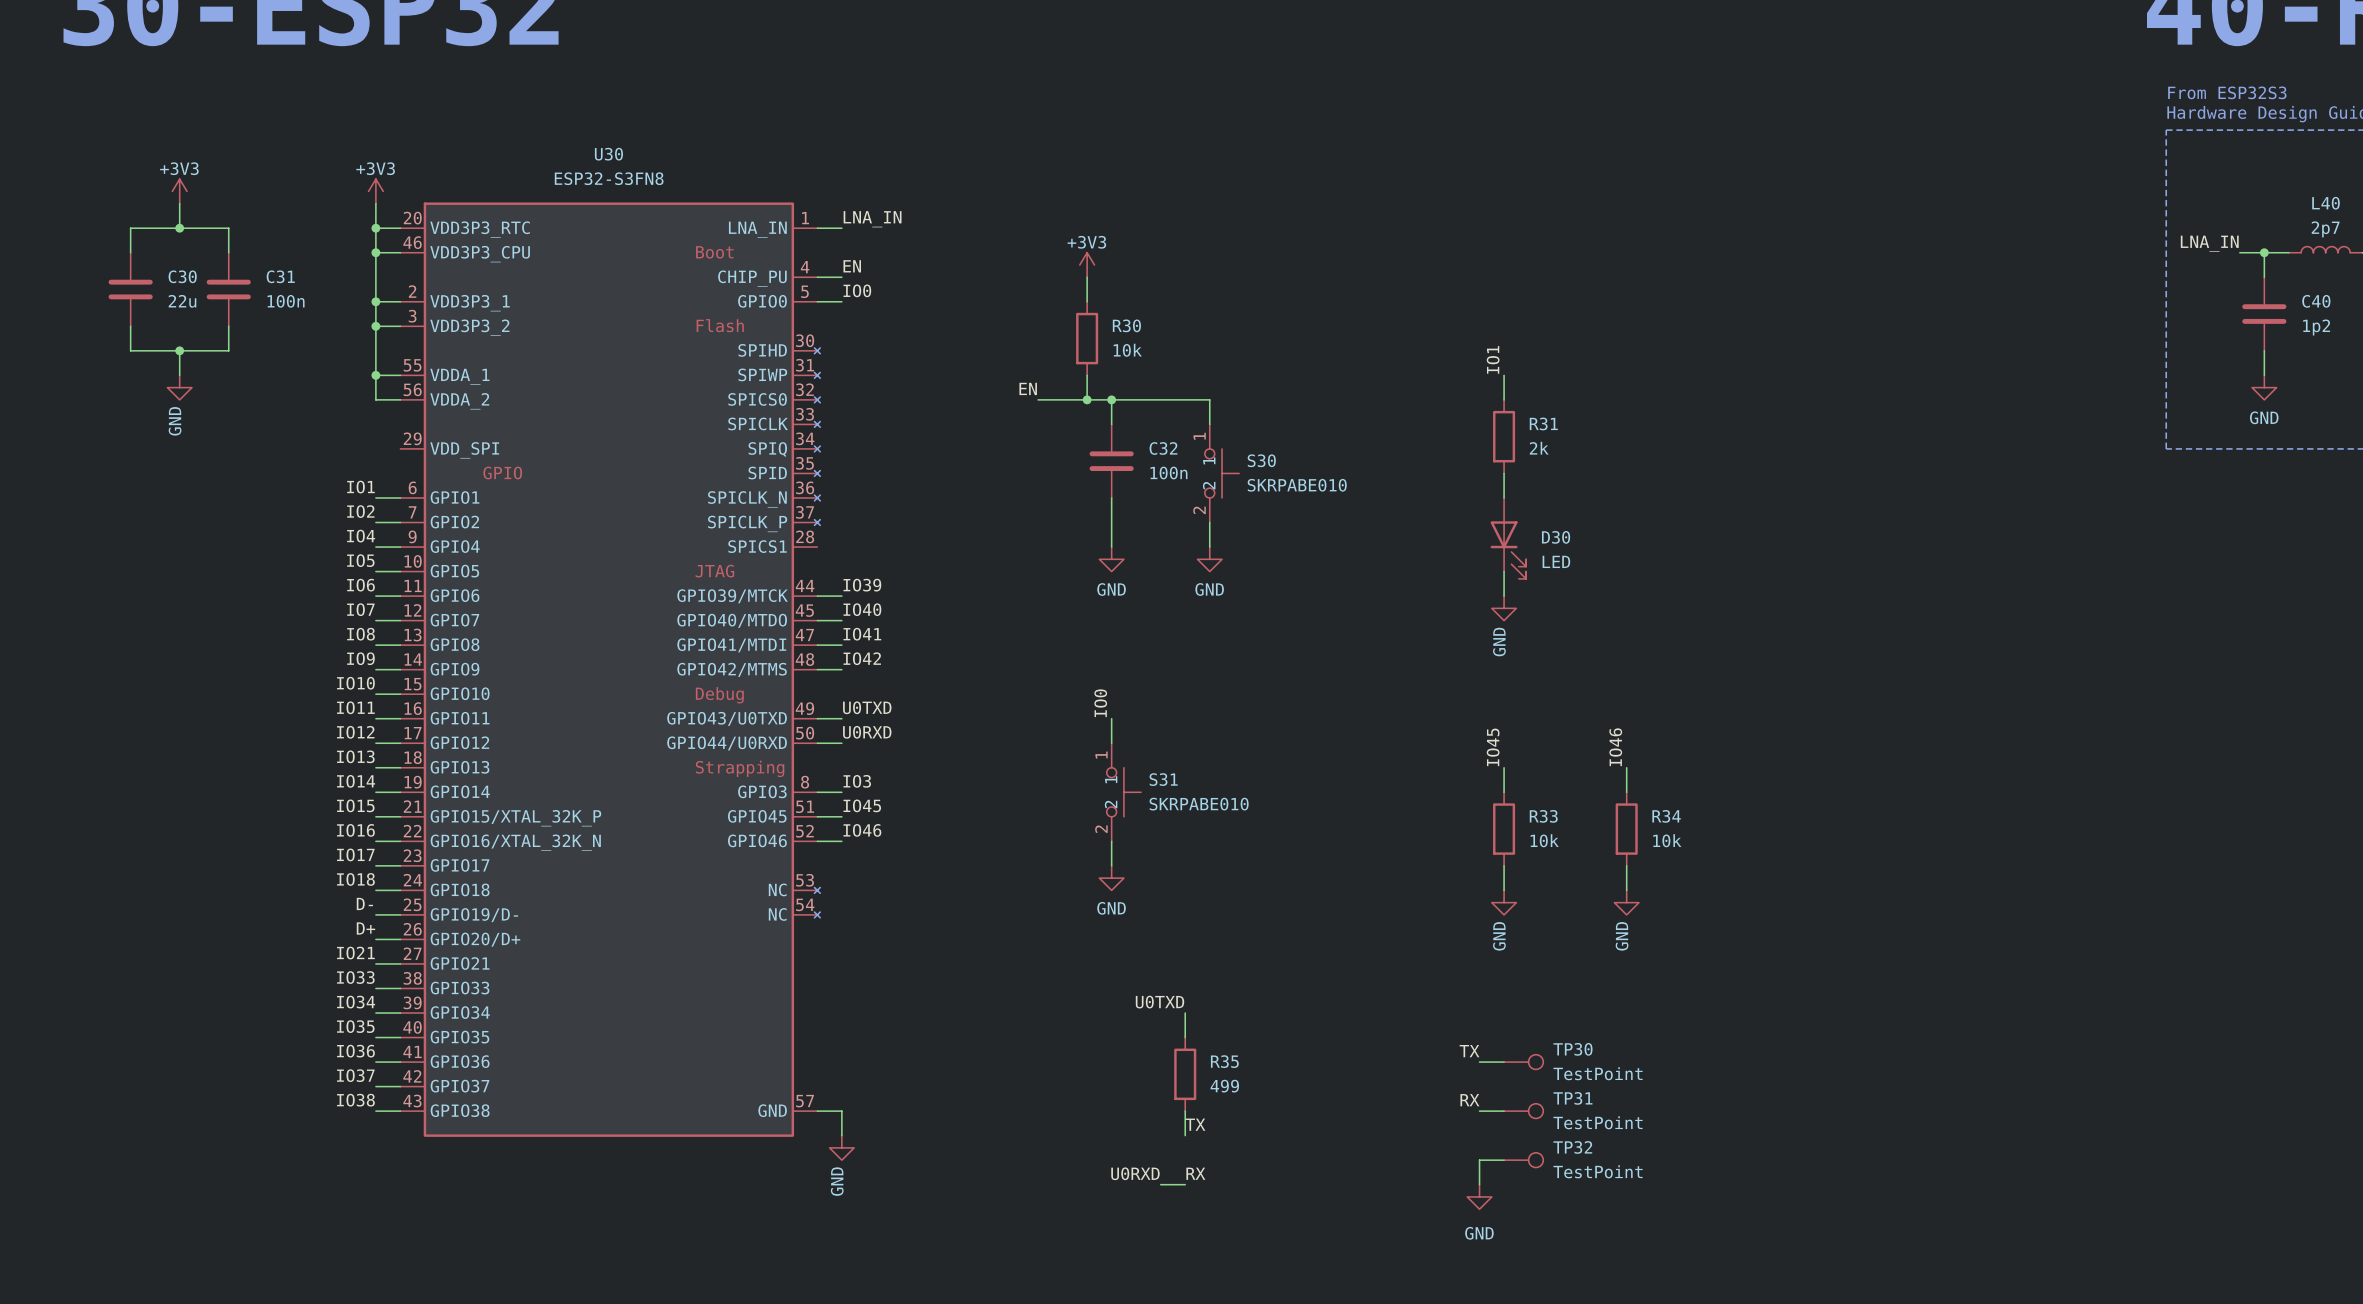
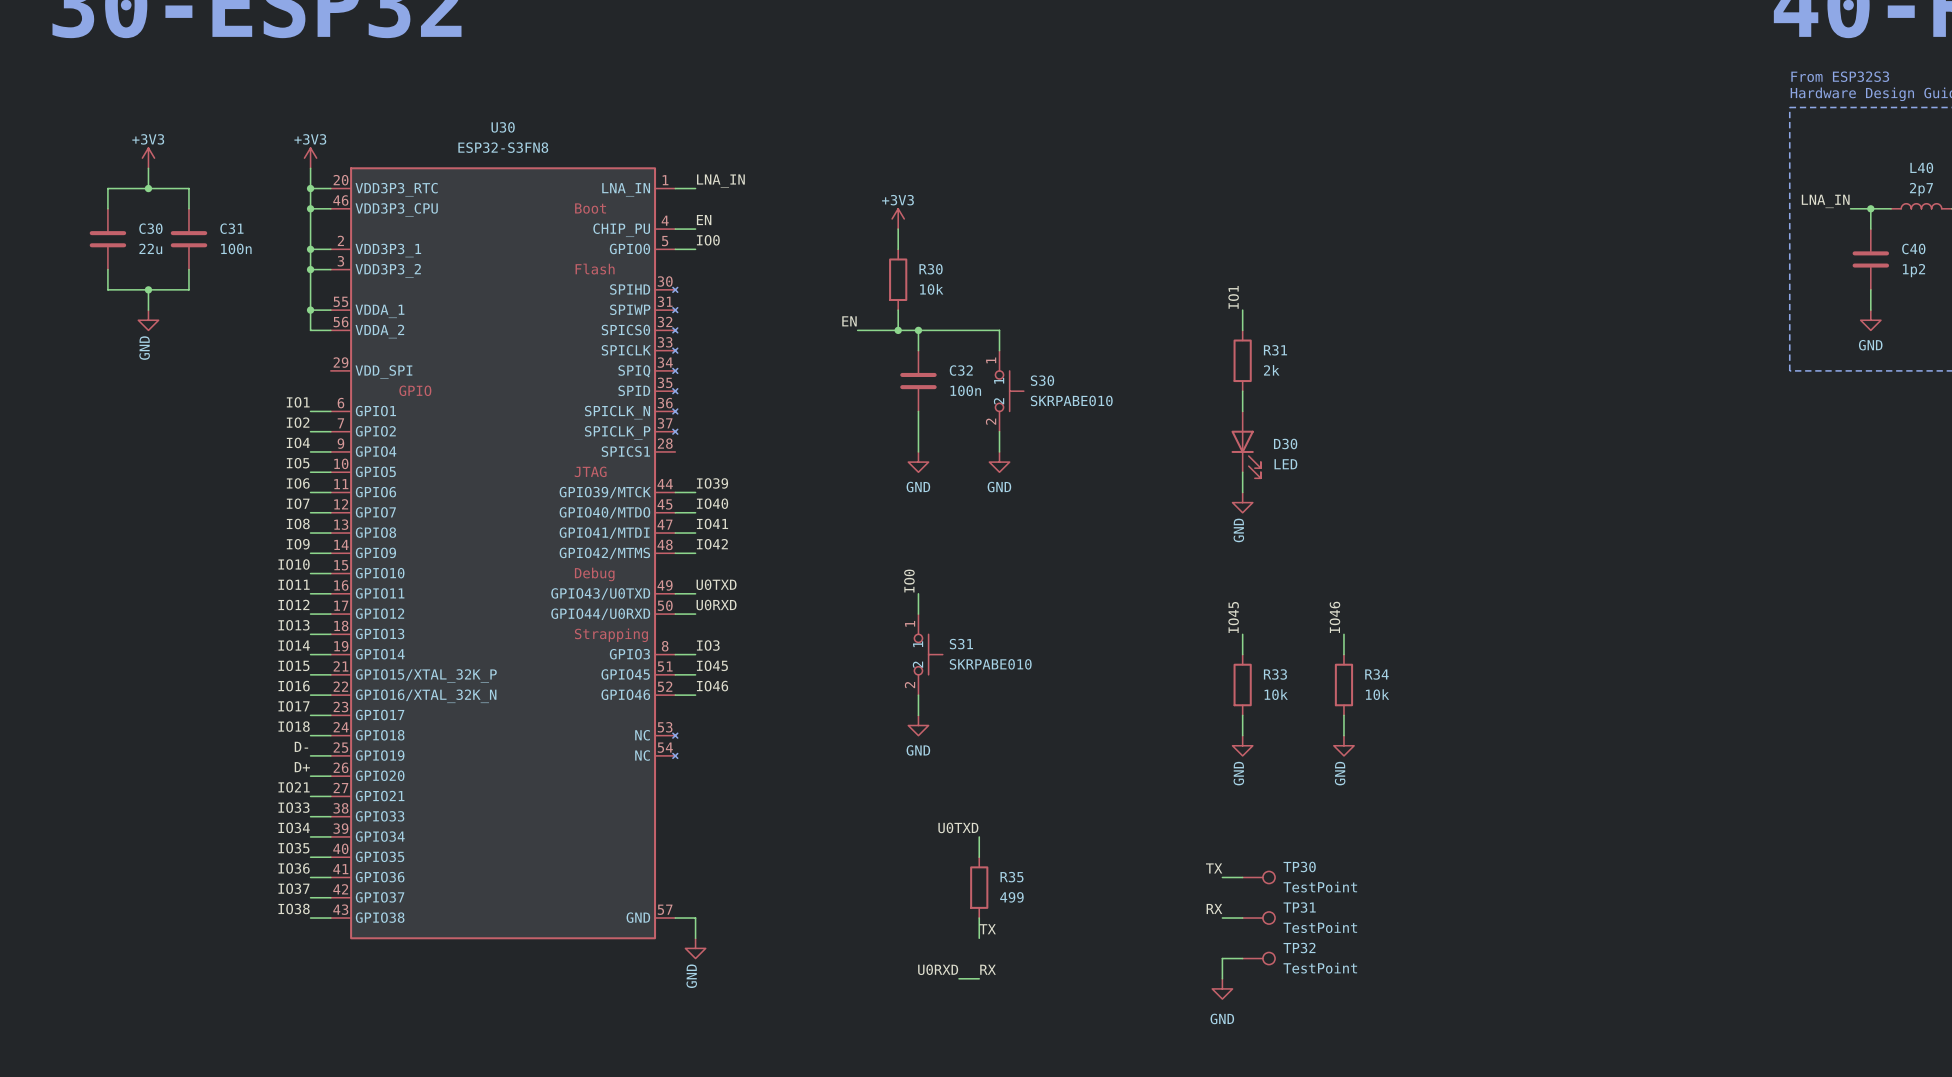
U30 pin name: GPIO19/D- (474, 915) -> GPIO19 (380, 755)
U30 pin name: GPIO20/D+ (475, 939) -> GPIO20 (380, 775)

